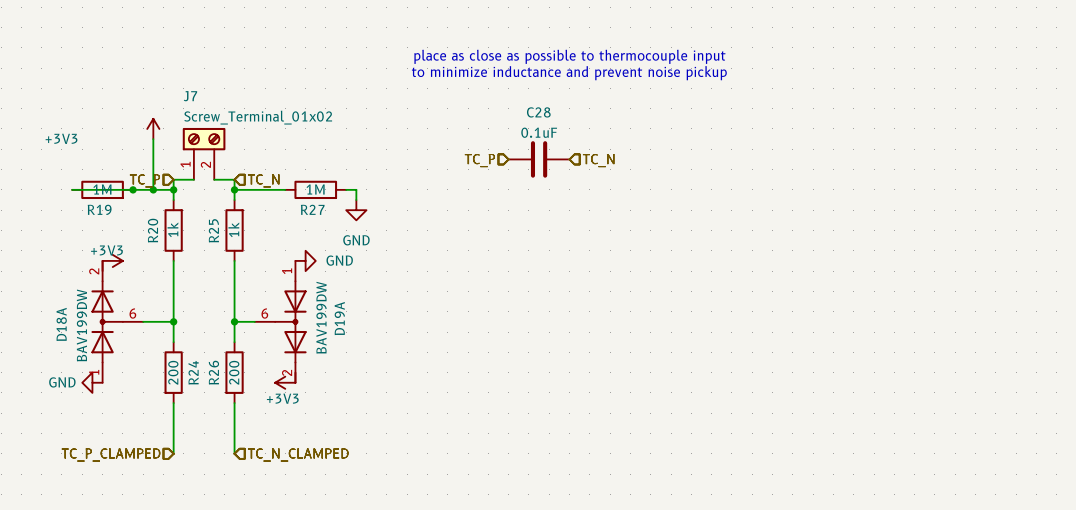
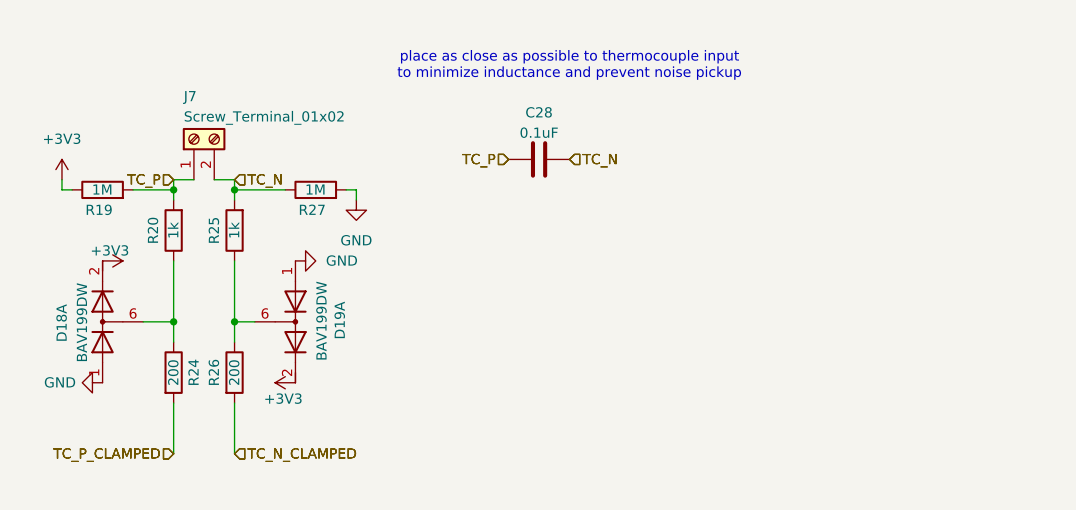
power symbol position: +3V3 (153, 128) -> +3V3 (61, 169)
wire: (153, 139) (153, 189) -> none
wire: (72, 189) (133, 189) -> (72, 189) (61, 189) (61, 179)
junction: (133, 189) -> none
junction: (153, 189) -> none

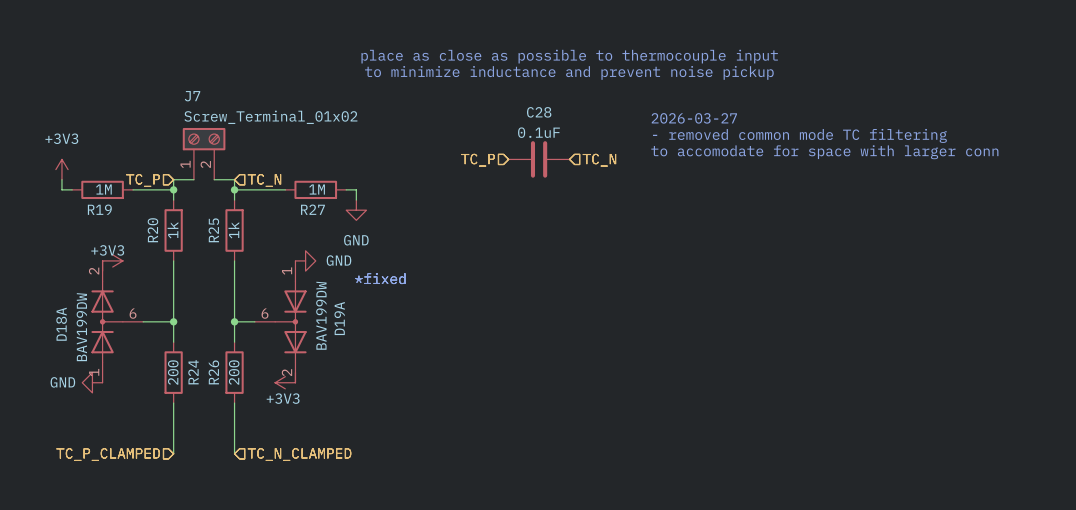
text: none -> 2026-03-27 (694, 118)
text: none -> - removed common mode TC filtering (799, 135)
text: none -> to accomodate for space with larger conn (824, 152)
text: none -> *fixed (380, 278)

